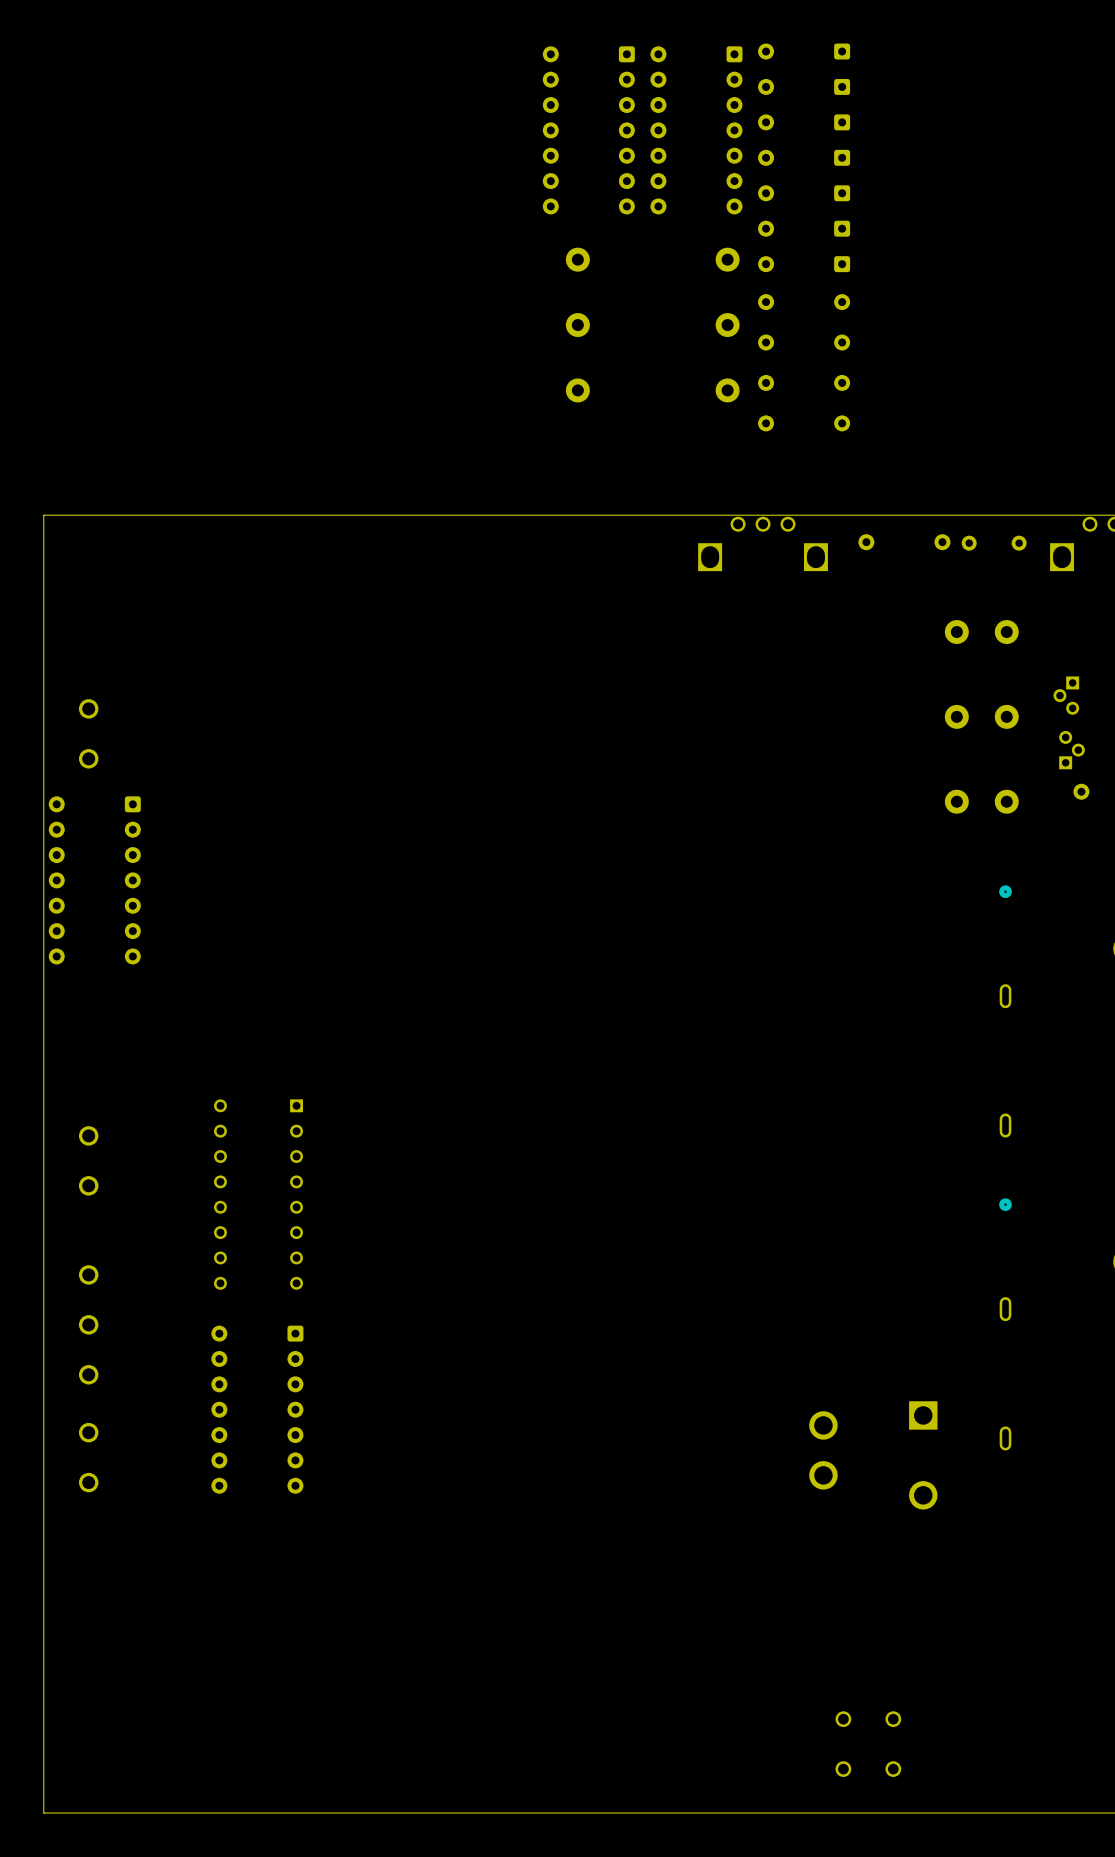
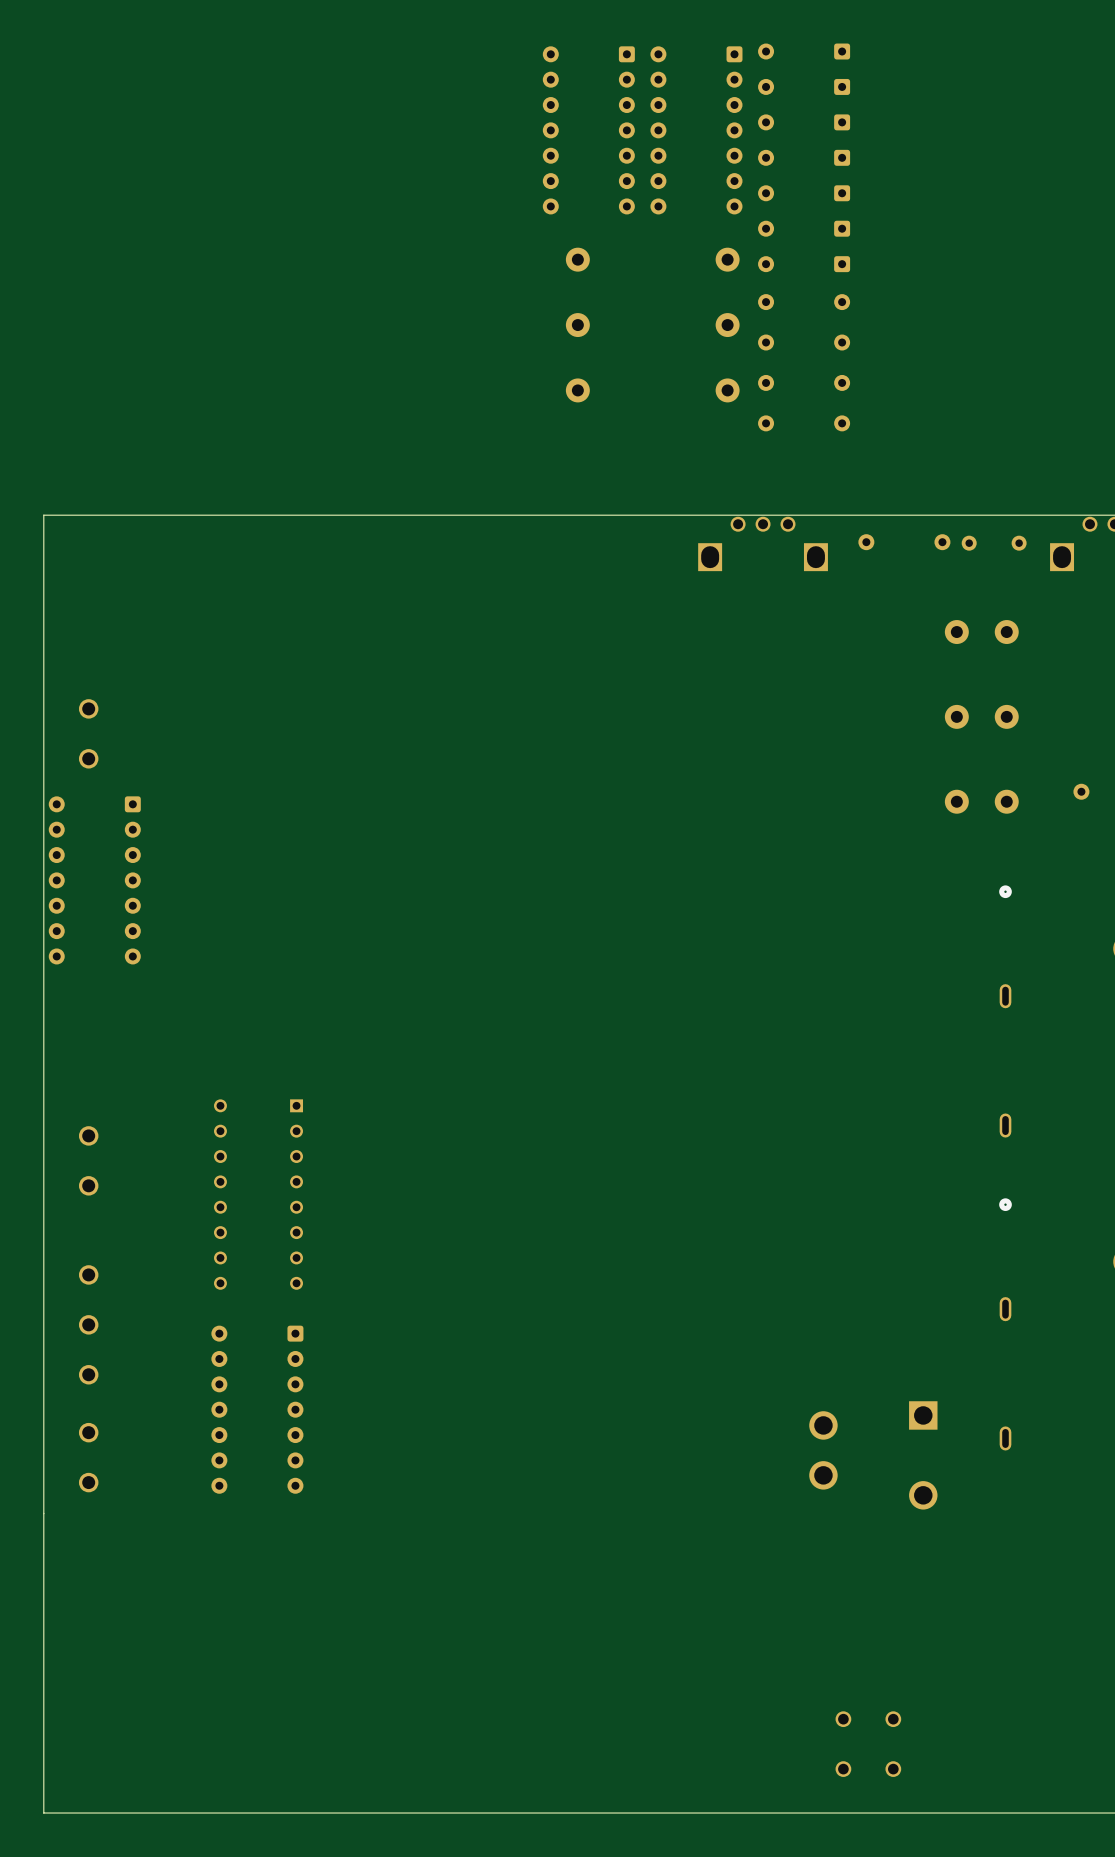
part: (1066, 695) -> none
part: (1071, 750) -> none

